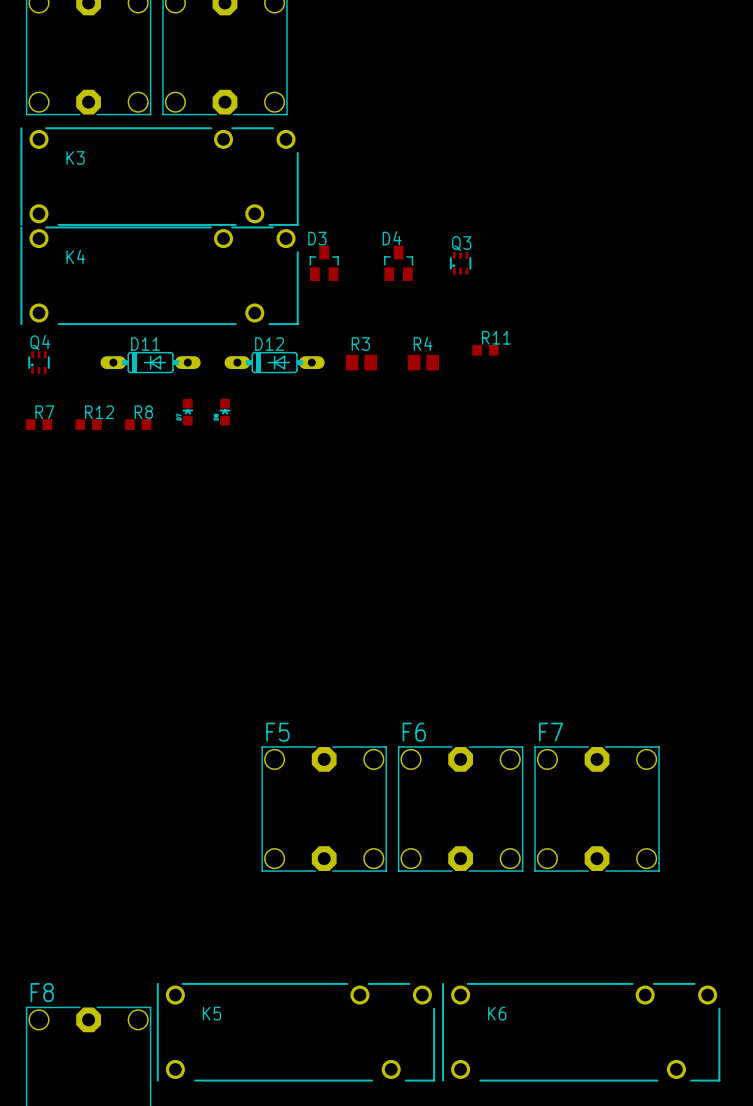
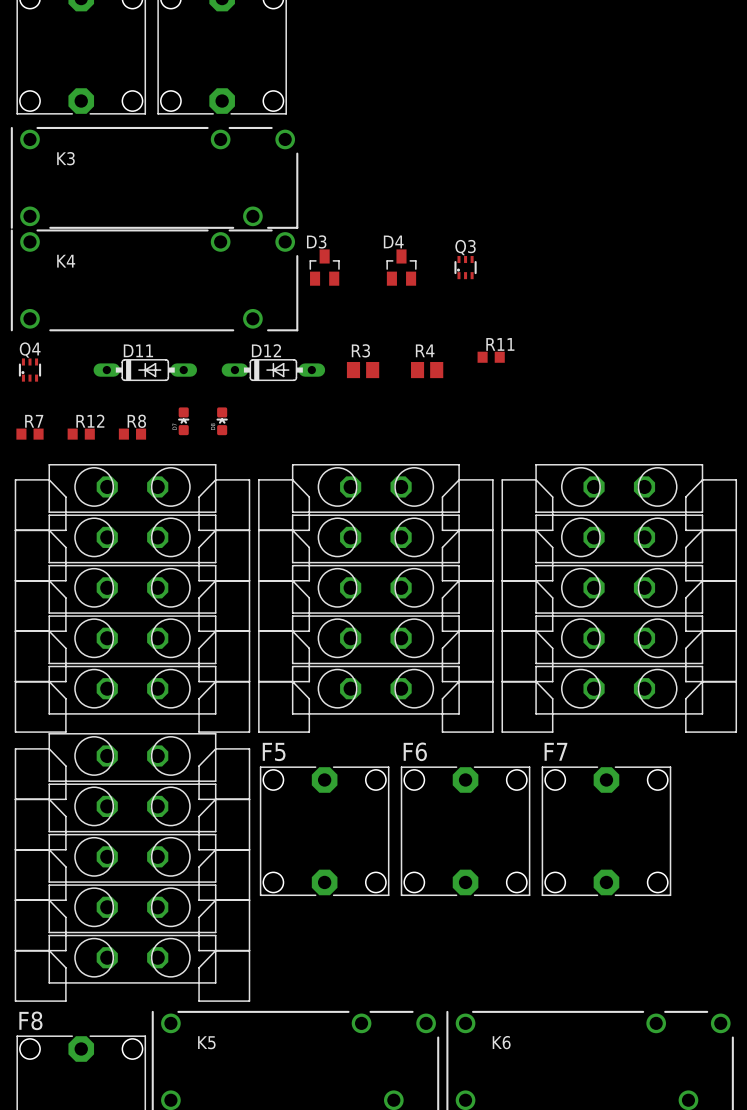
part: none -> (132, 598)
part: none -> (375, 598)
part: none -> (619, 598)
part: none -> (132, 867)

